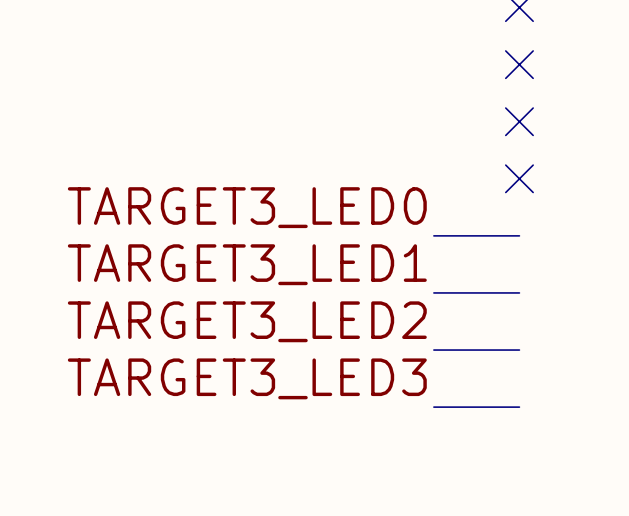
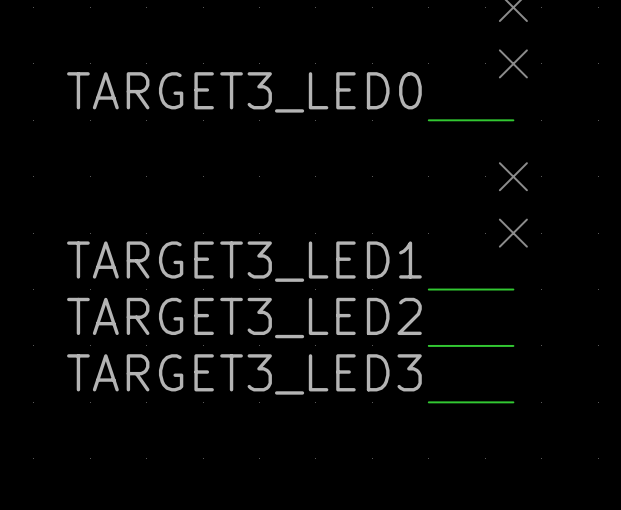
no-connect mark position: (519, 121) -> (513, 233)
label position: TARGET3_LED0 (247, 207) -> TARGET3_LED0 (244, 92)
wire: (433, 235) (519, 235) -> (428, 120) (513, 120)

